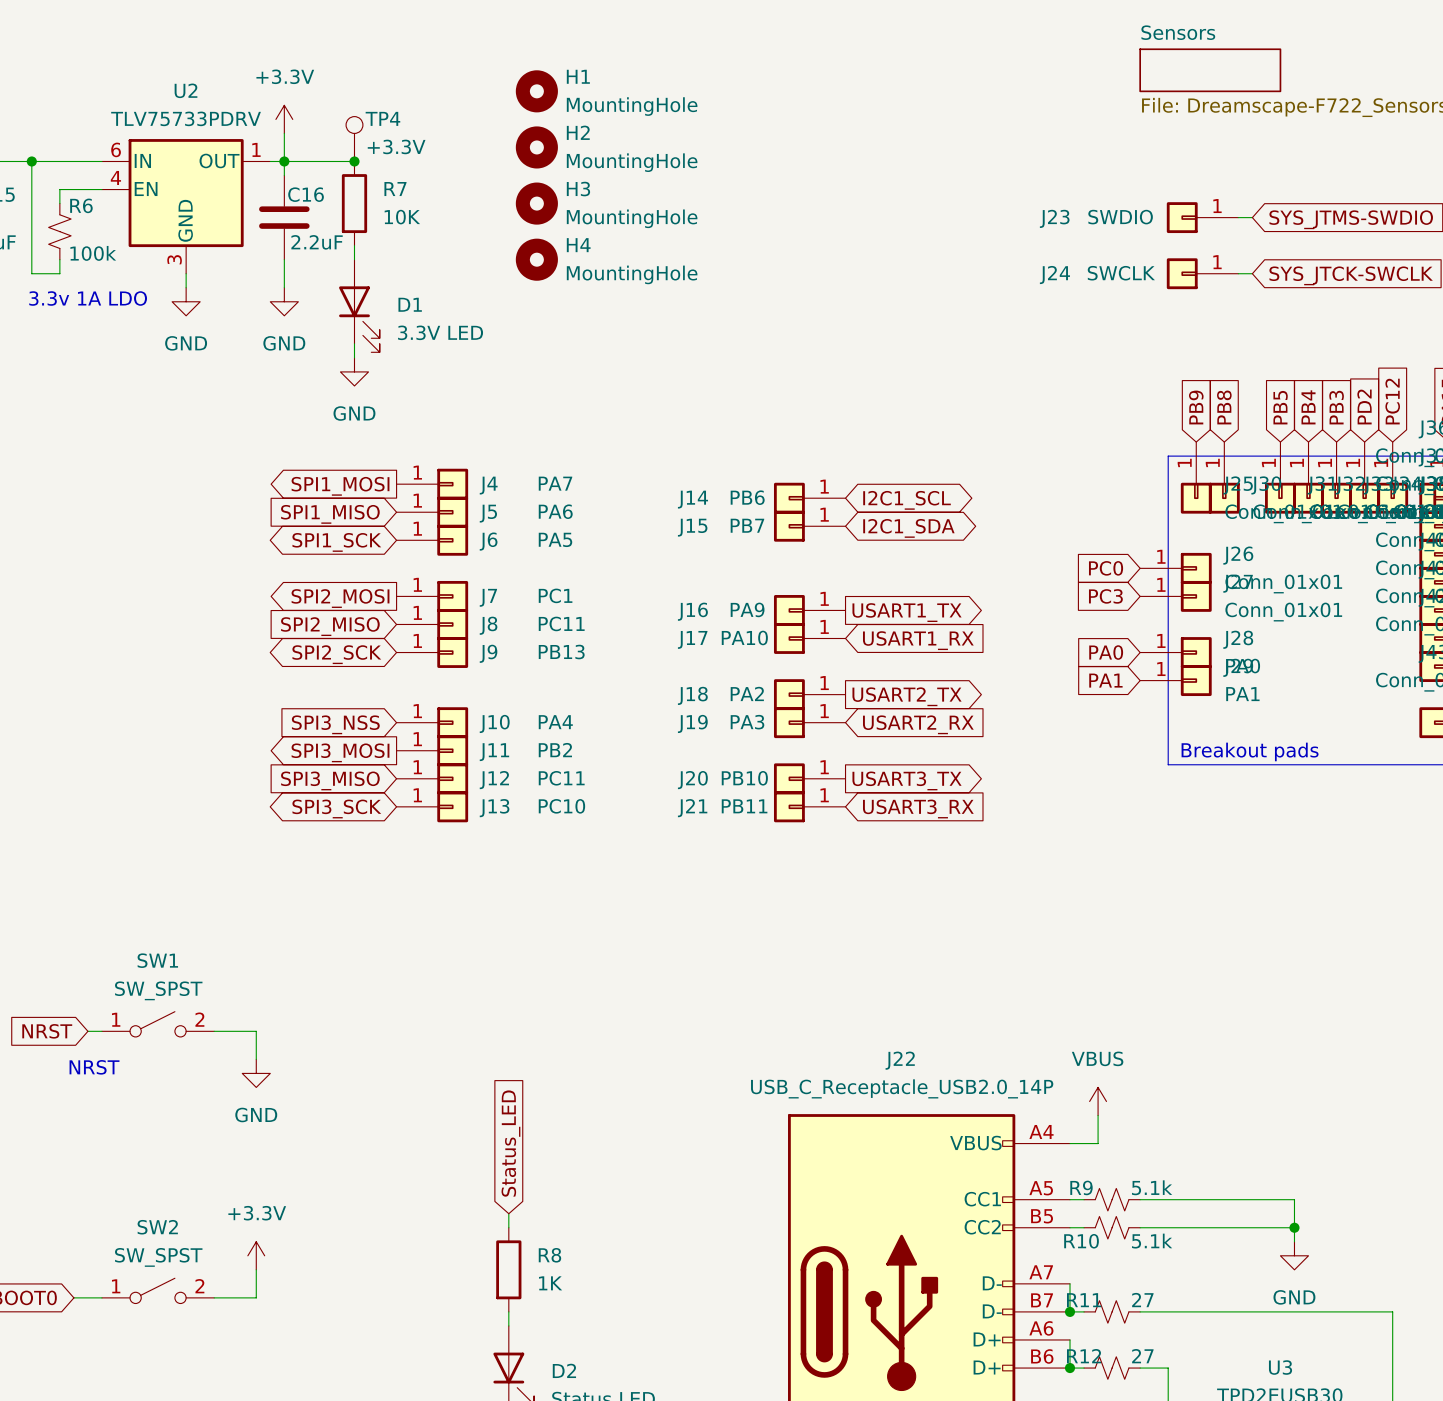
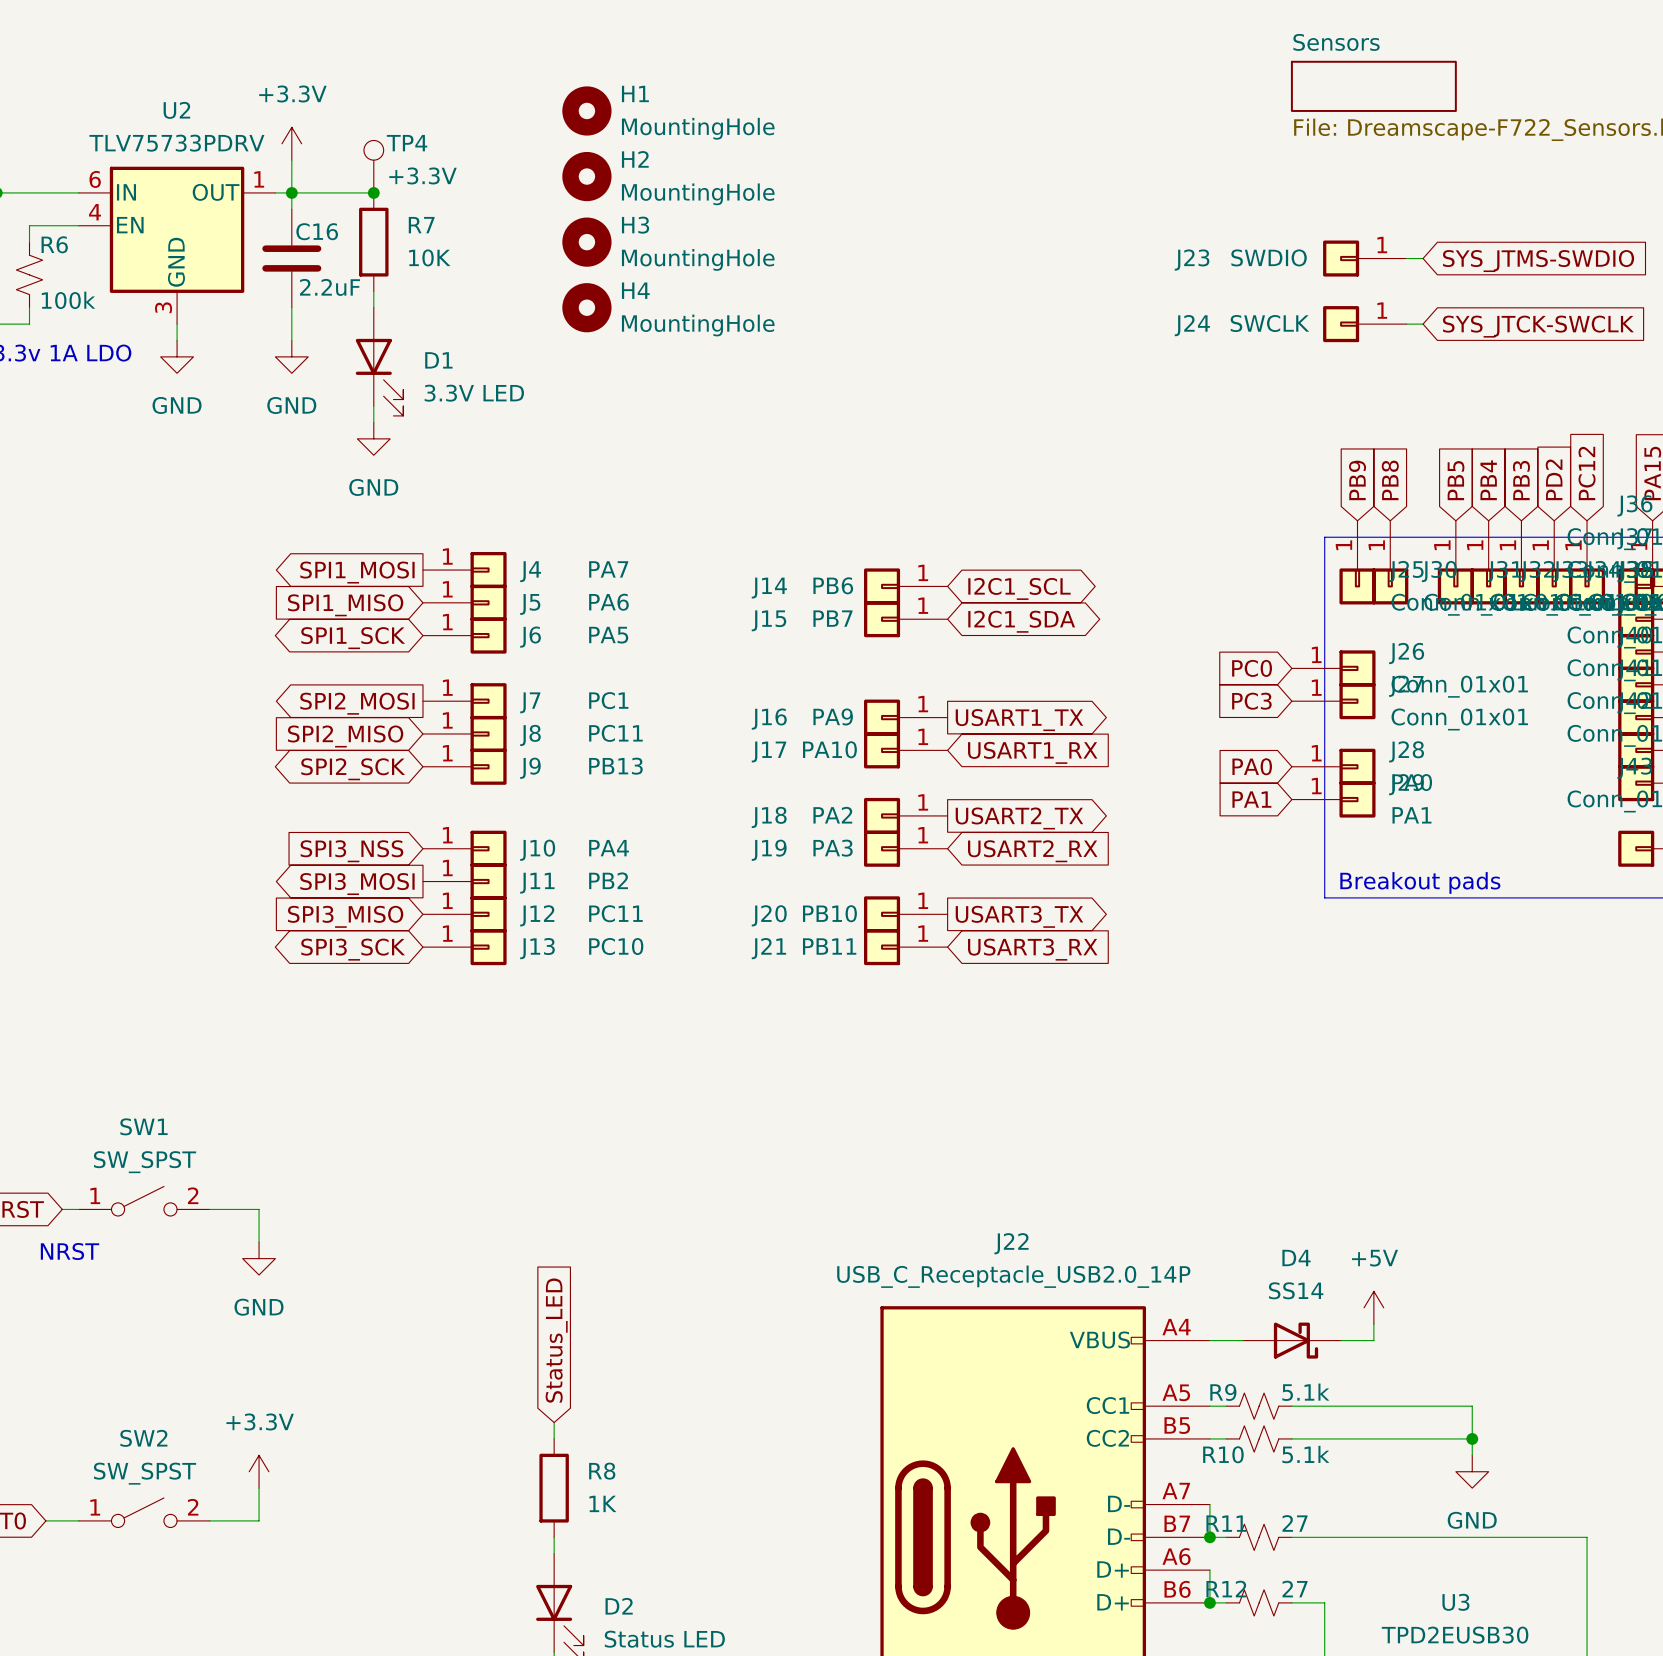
power symbol: VBUS (1098, 1101) -> none
wire: (1098, 1115) (1098, 1143) -> none
power symbol: none -> +5V (1373, 1307)
wire: none -> (1373, 1324) (1373, 1340) (1341, 1340)
D4: none -> SS14 (1291, 1340)

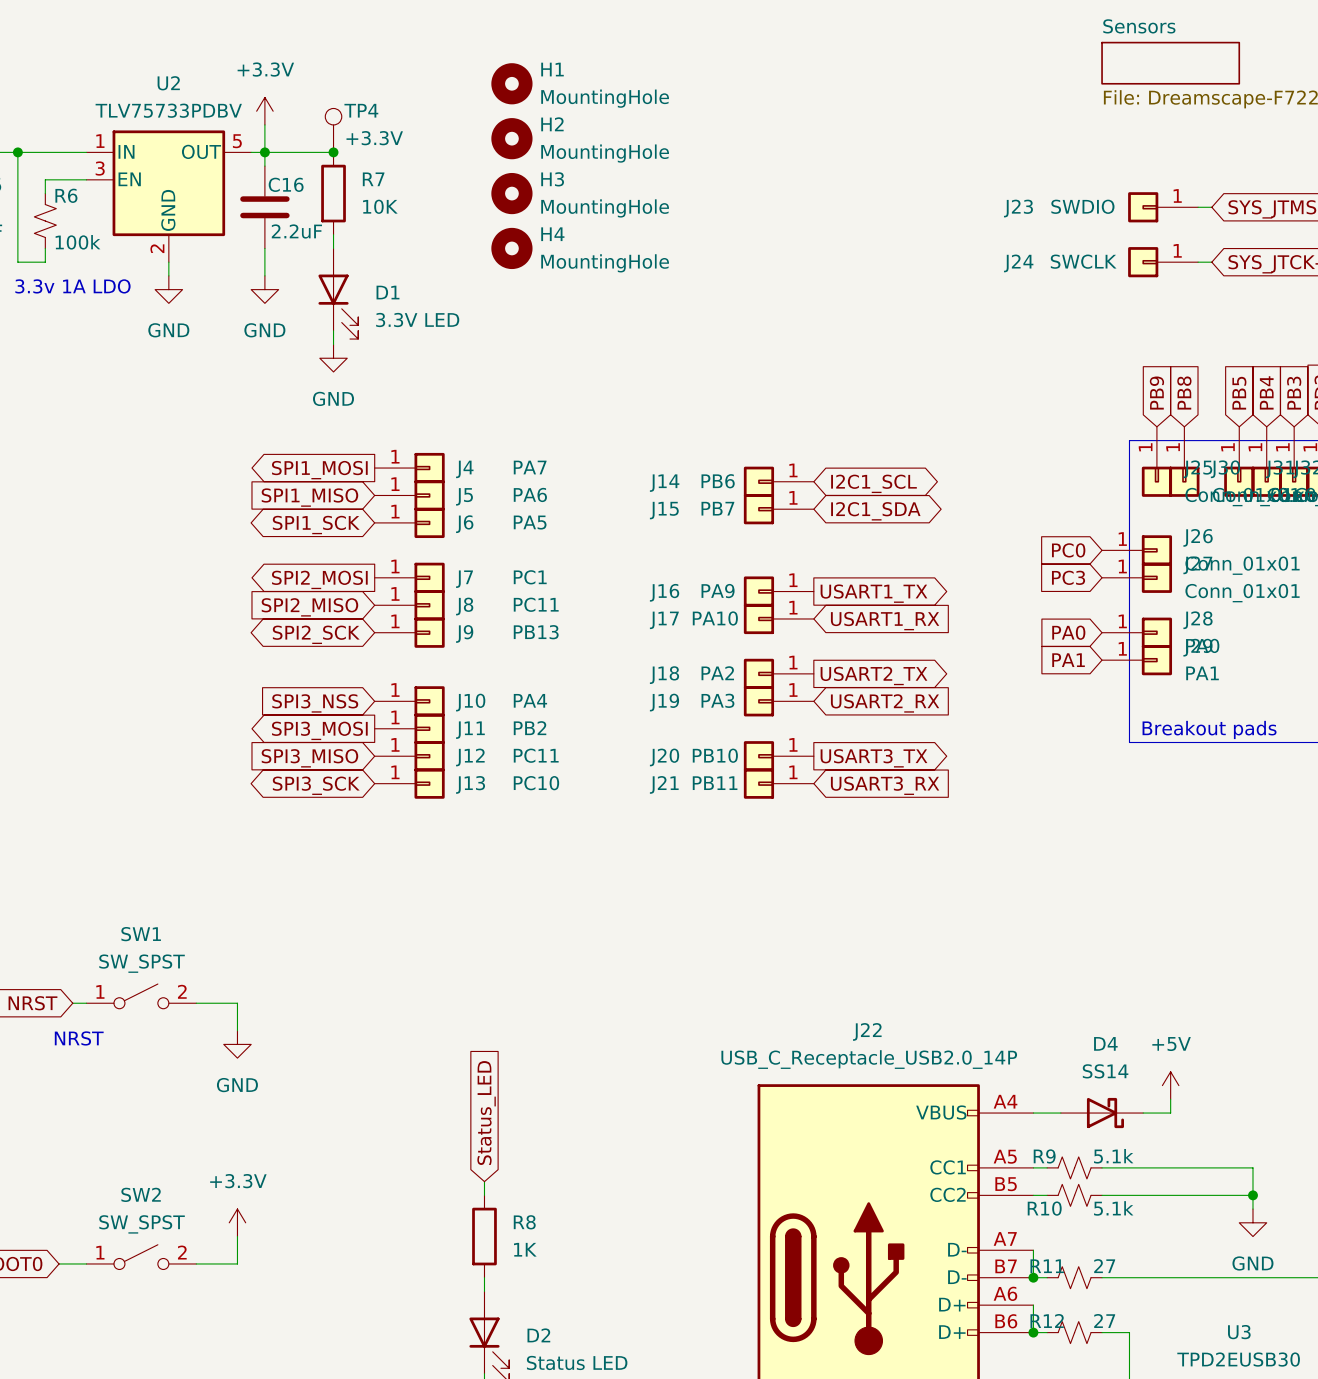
U2 value: TLV75733PDRV (176, 143) -> TLV75733PDBV (168, 110)
U2 pin number: 6 (95, 179) -> 1 (100, 141)
U2 pin number: 1 (259, 179) -> 5 (237, 141)
U2 pin number: 4 (95, 212) -> 3 (100, 168)
U2 pin number: 3 (163, 307) -> 2 (157, 248)

